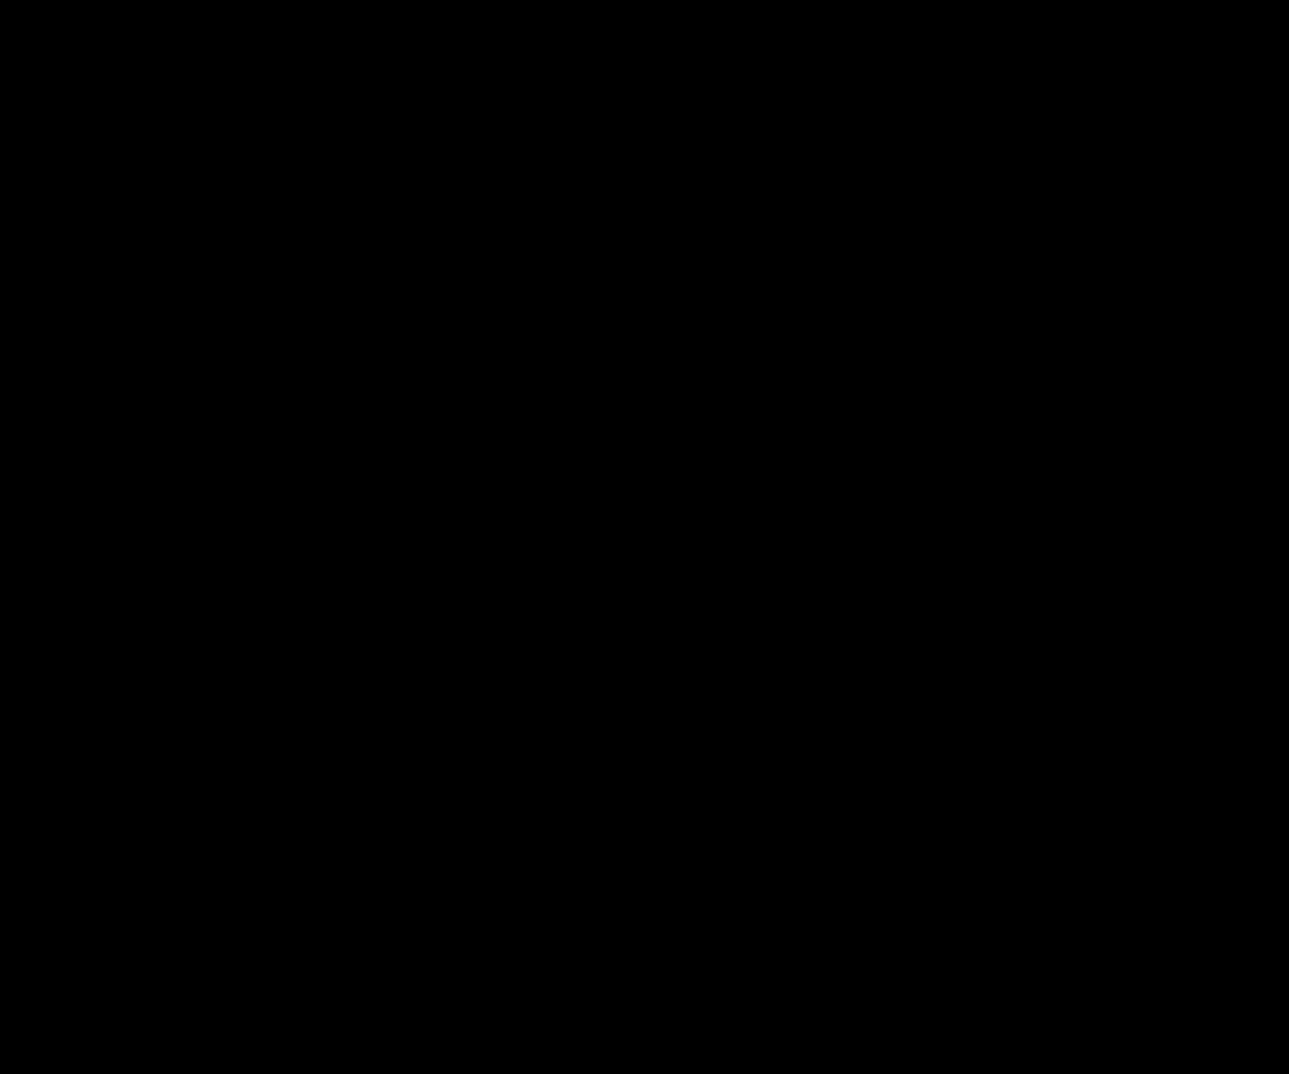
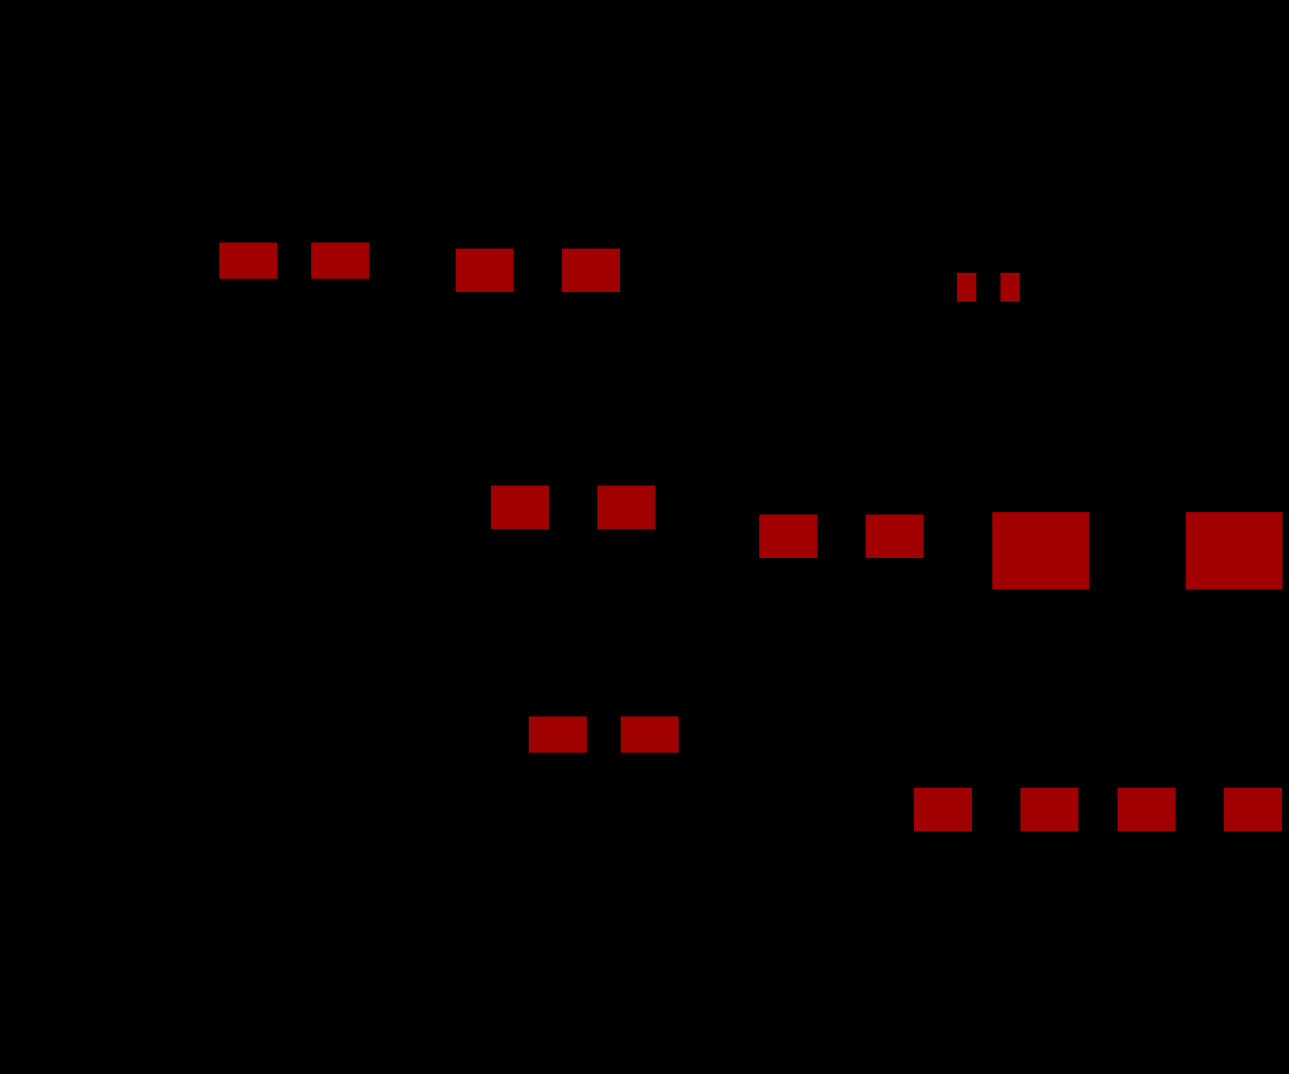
part: none -> (294, 260)
part: none -> (537, 270)
part: none -> (988, 287)
part: none -> (573, 507)
part: none -> (841, 536)
part: none -> (1137, 550)
part: none -> (603, 734)
part: none -> (996, 809)
part: none -> (1199, 809)

